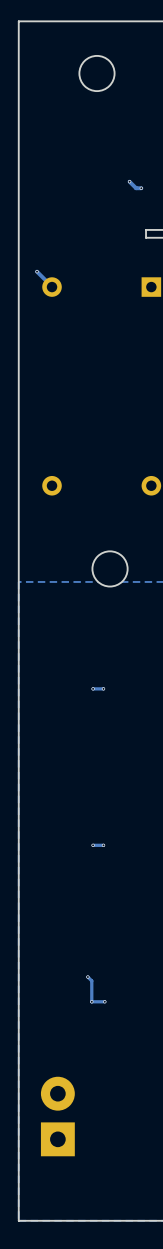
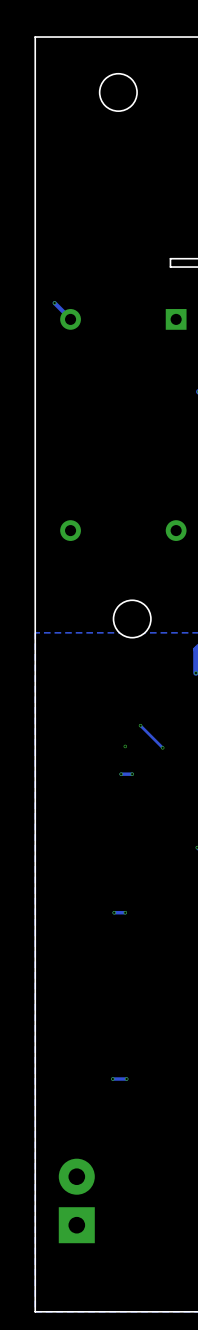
track: (129, 181) (136, 188) (141, 188) -> none
via: (129, 181) -> none
via: (141, 188) -> none
track: none -> (140, 725) (162, 747)
via: none -> (140, 725)
via: (93, 688) -> none
track: (103, 688) (93, 688) -> (132, 774) (121, 774)
via: none -> (162, 747)
via: none -> (121, 774)
via: none -> (132, 774)
track: (87, 977) (91, 980) (91, 1001) -> none
via: (87, 977) -> none

